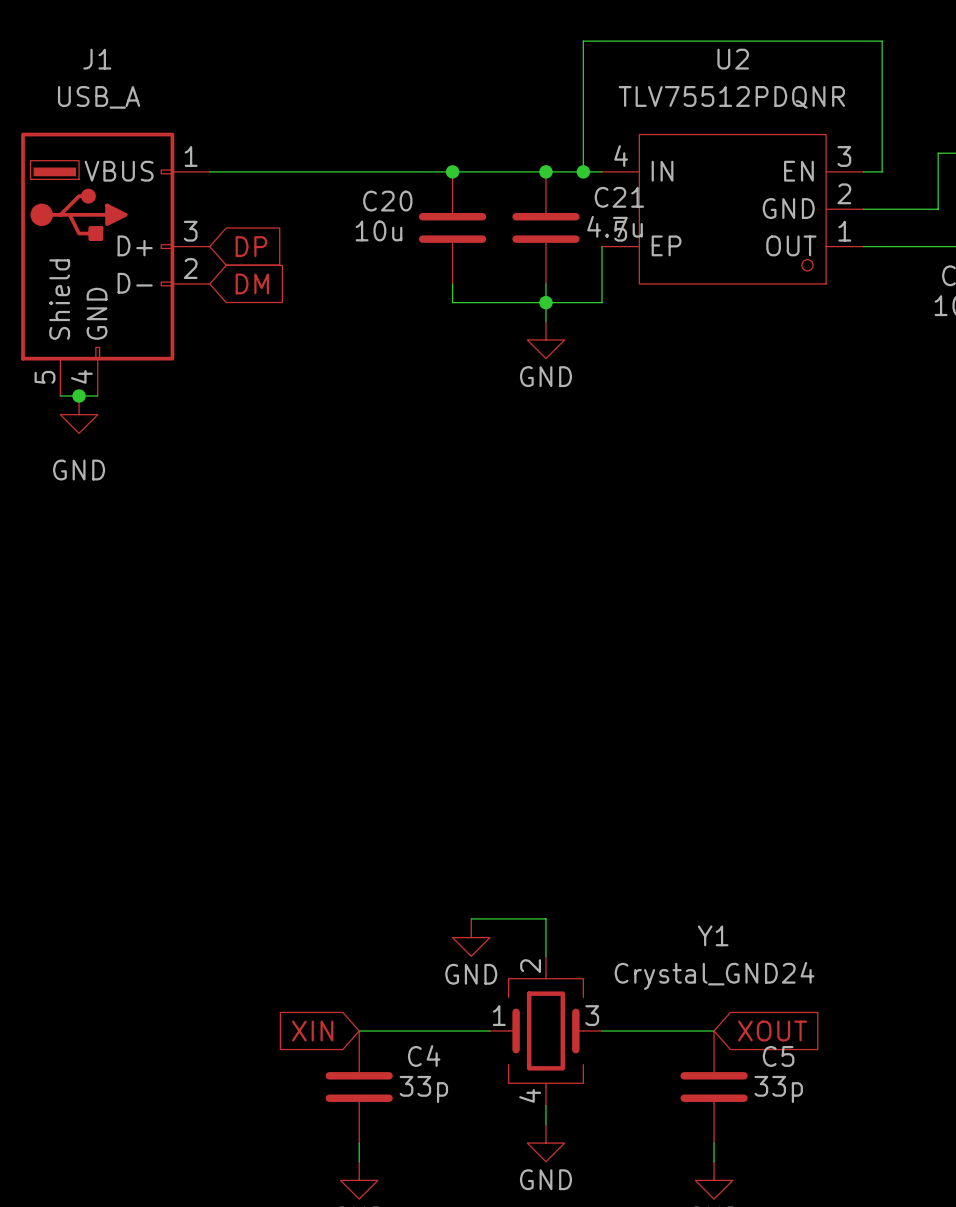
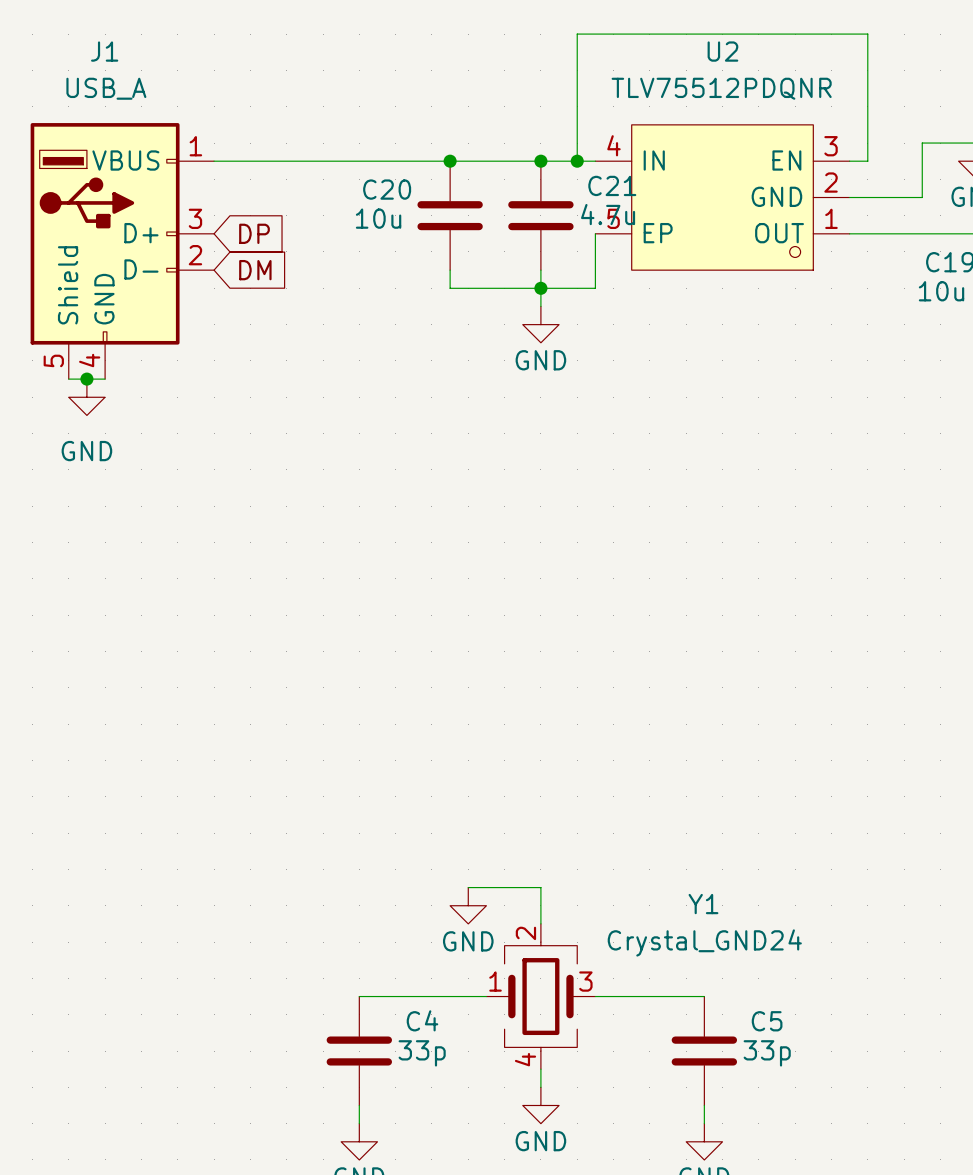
global label: XIN (312, 1031) -> none
global label: XOUT (772, 1031) -> none

